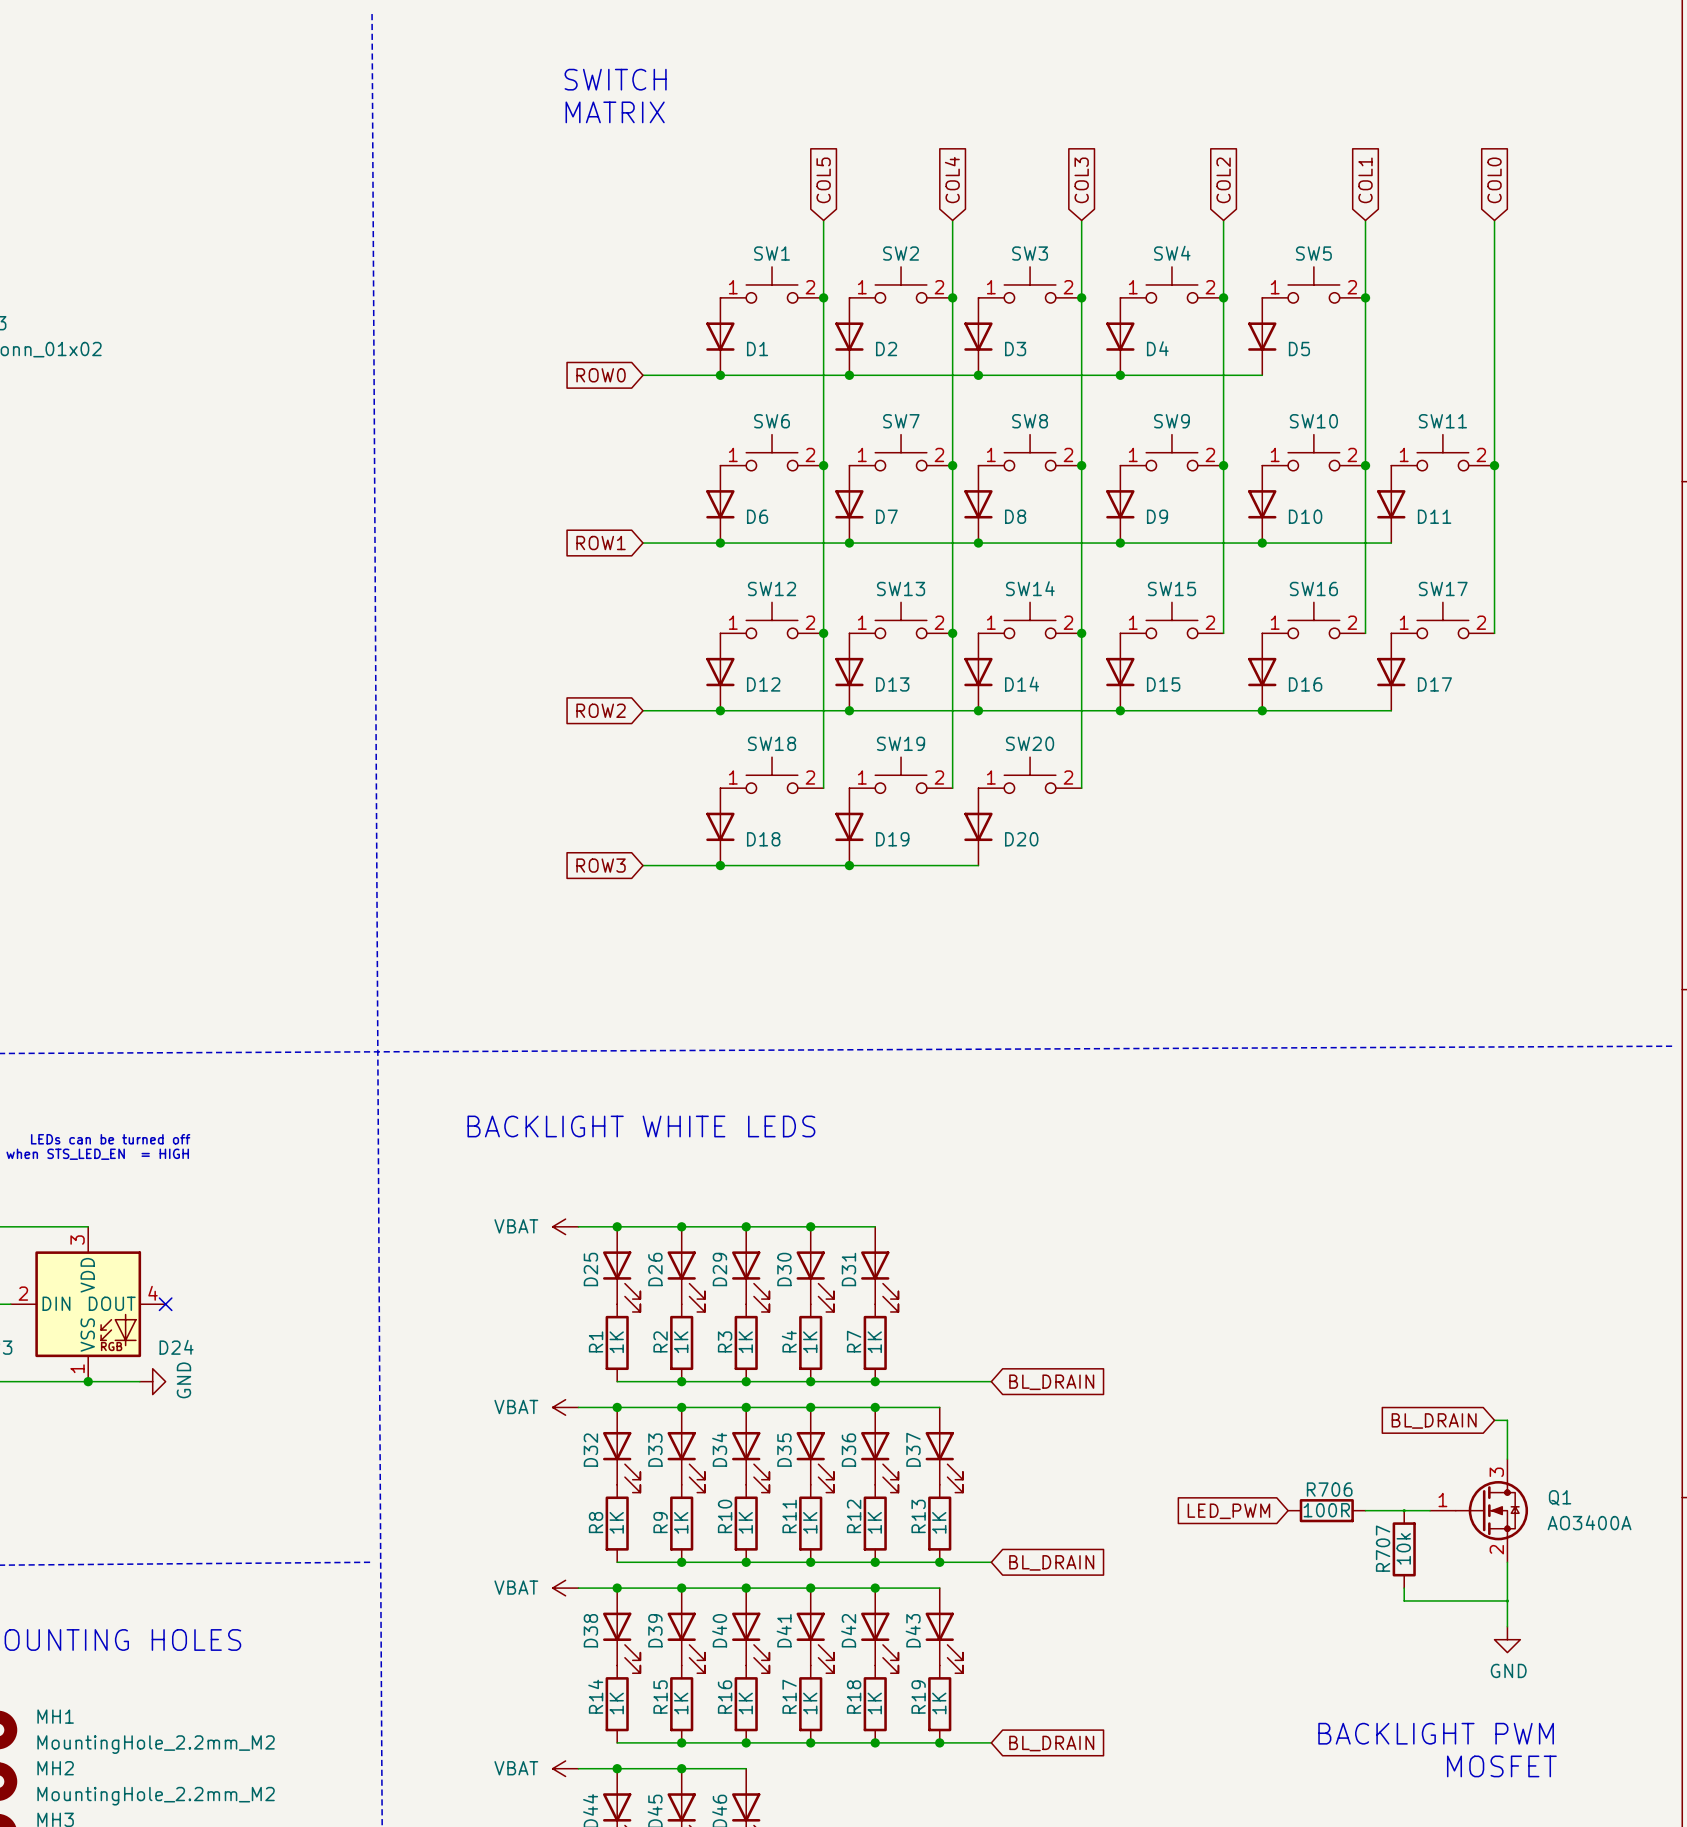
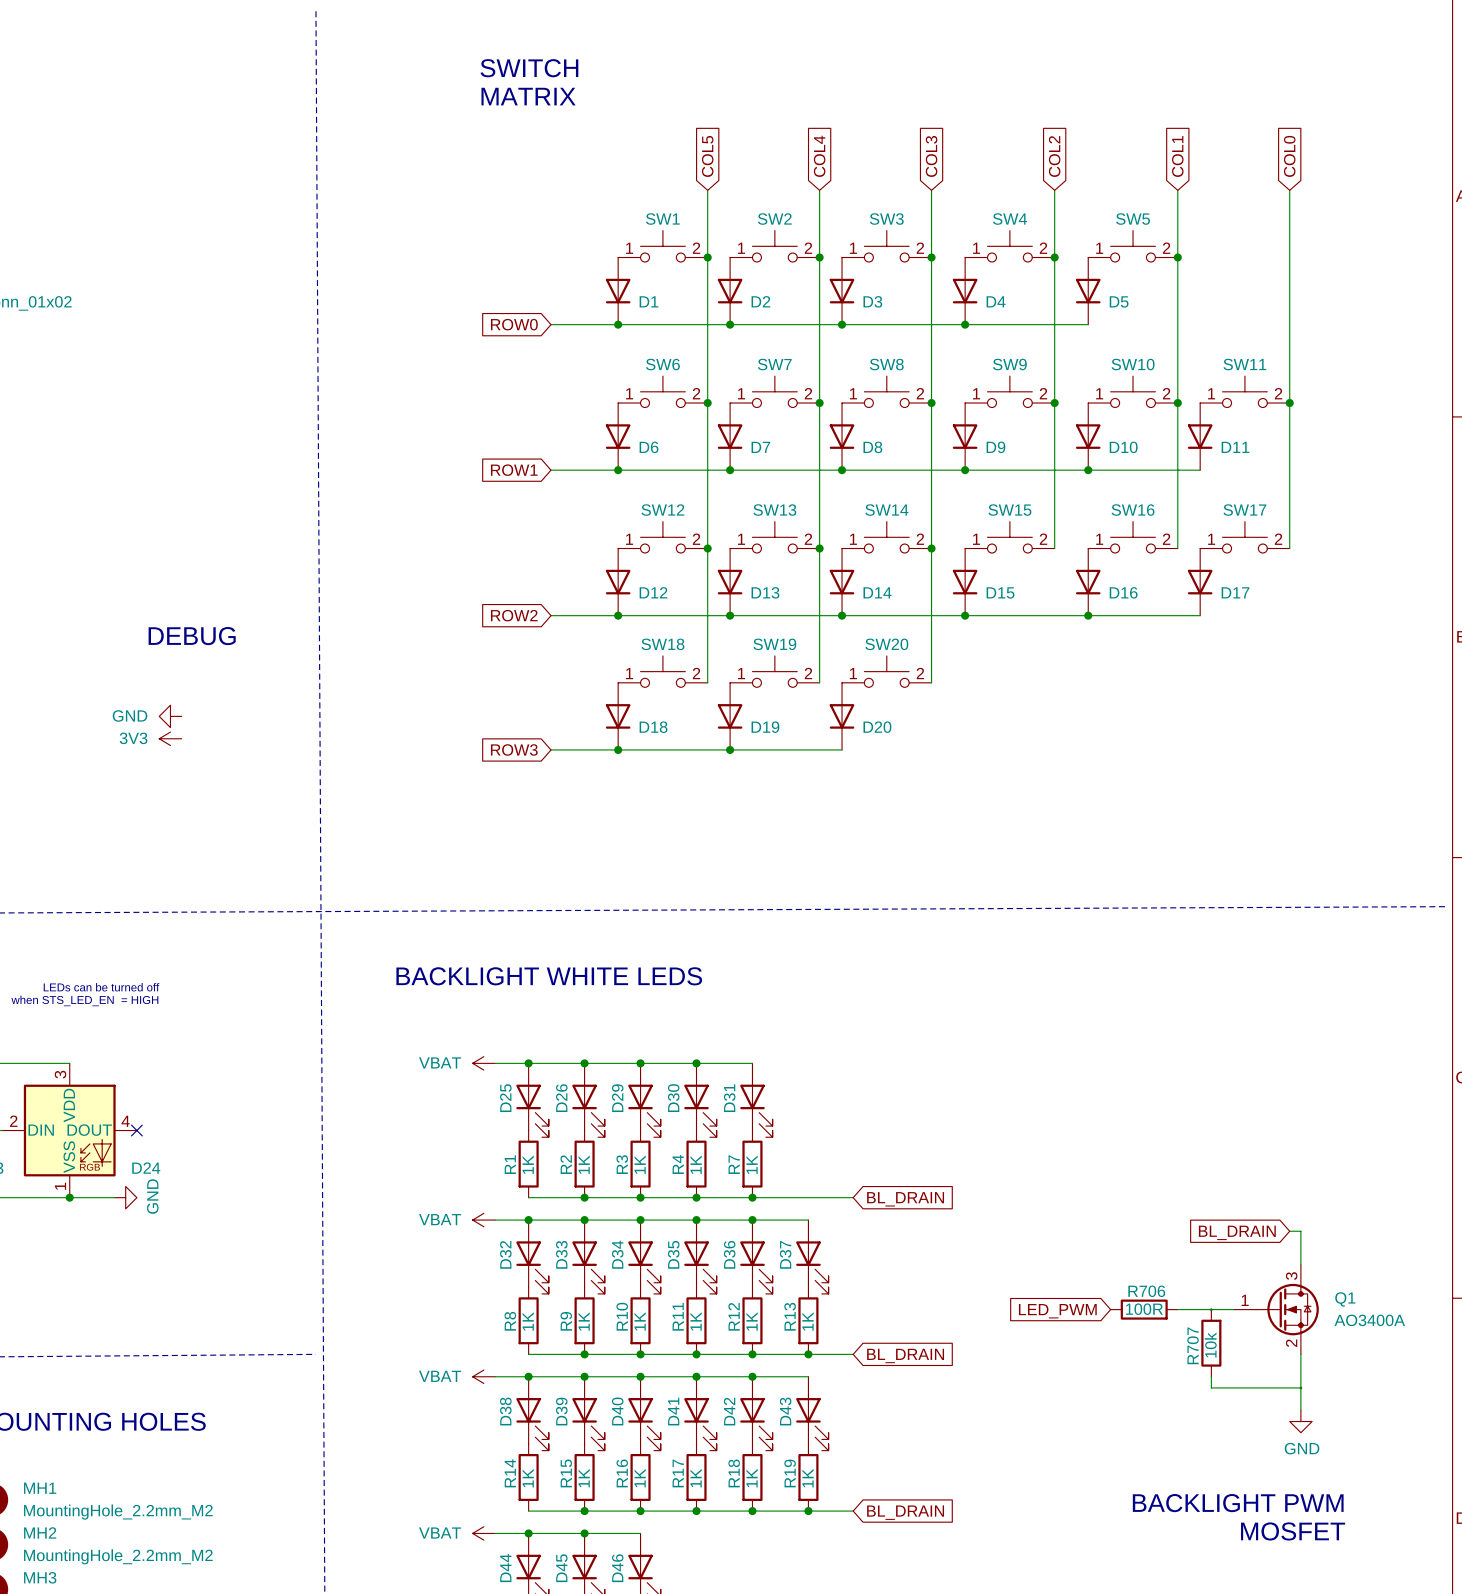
text: none -> DEBUG (192, 636)
power symbol: none -> GND (170, 716)
power symbol: none -> 3V3 (170, 738)

